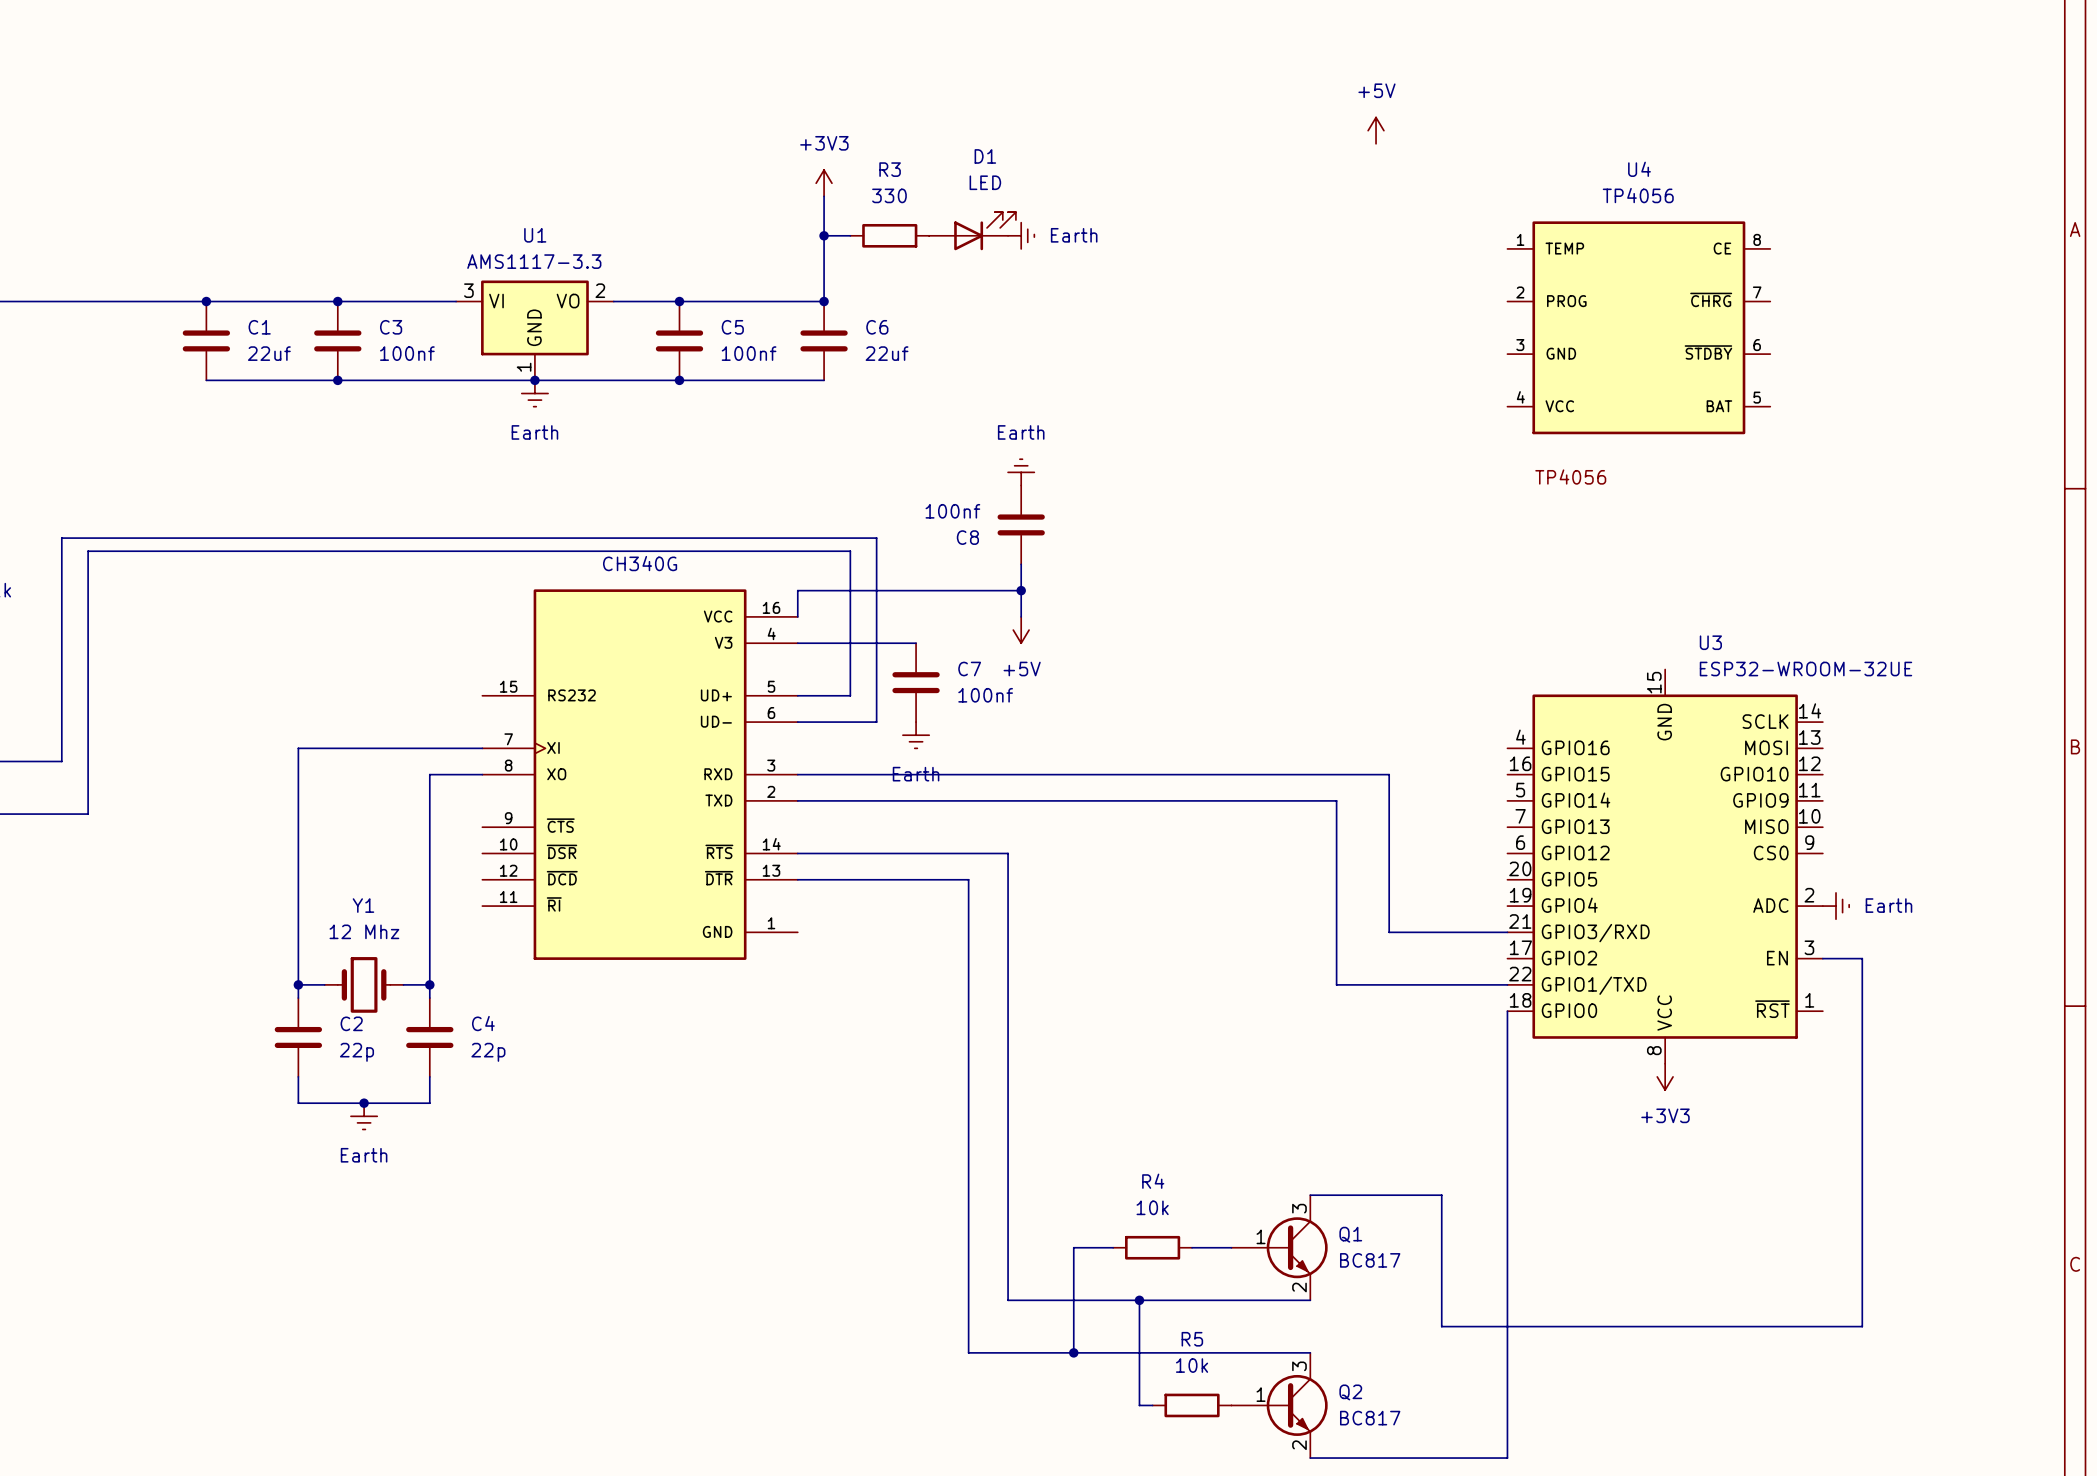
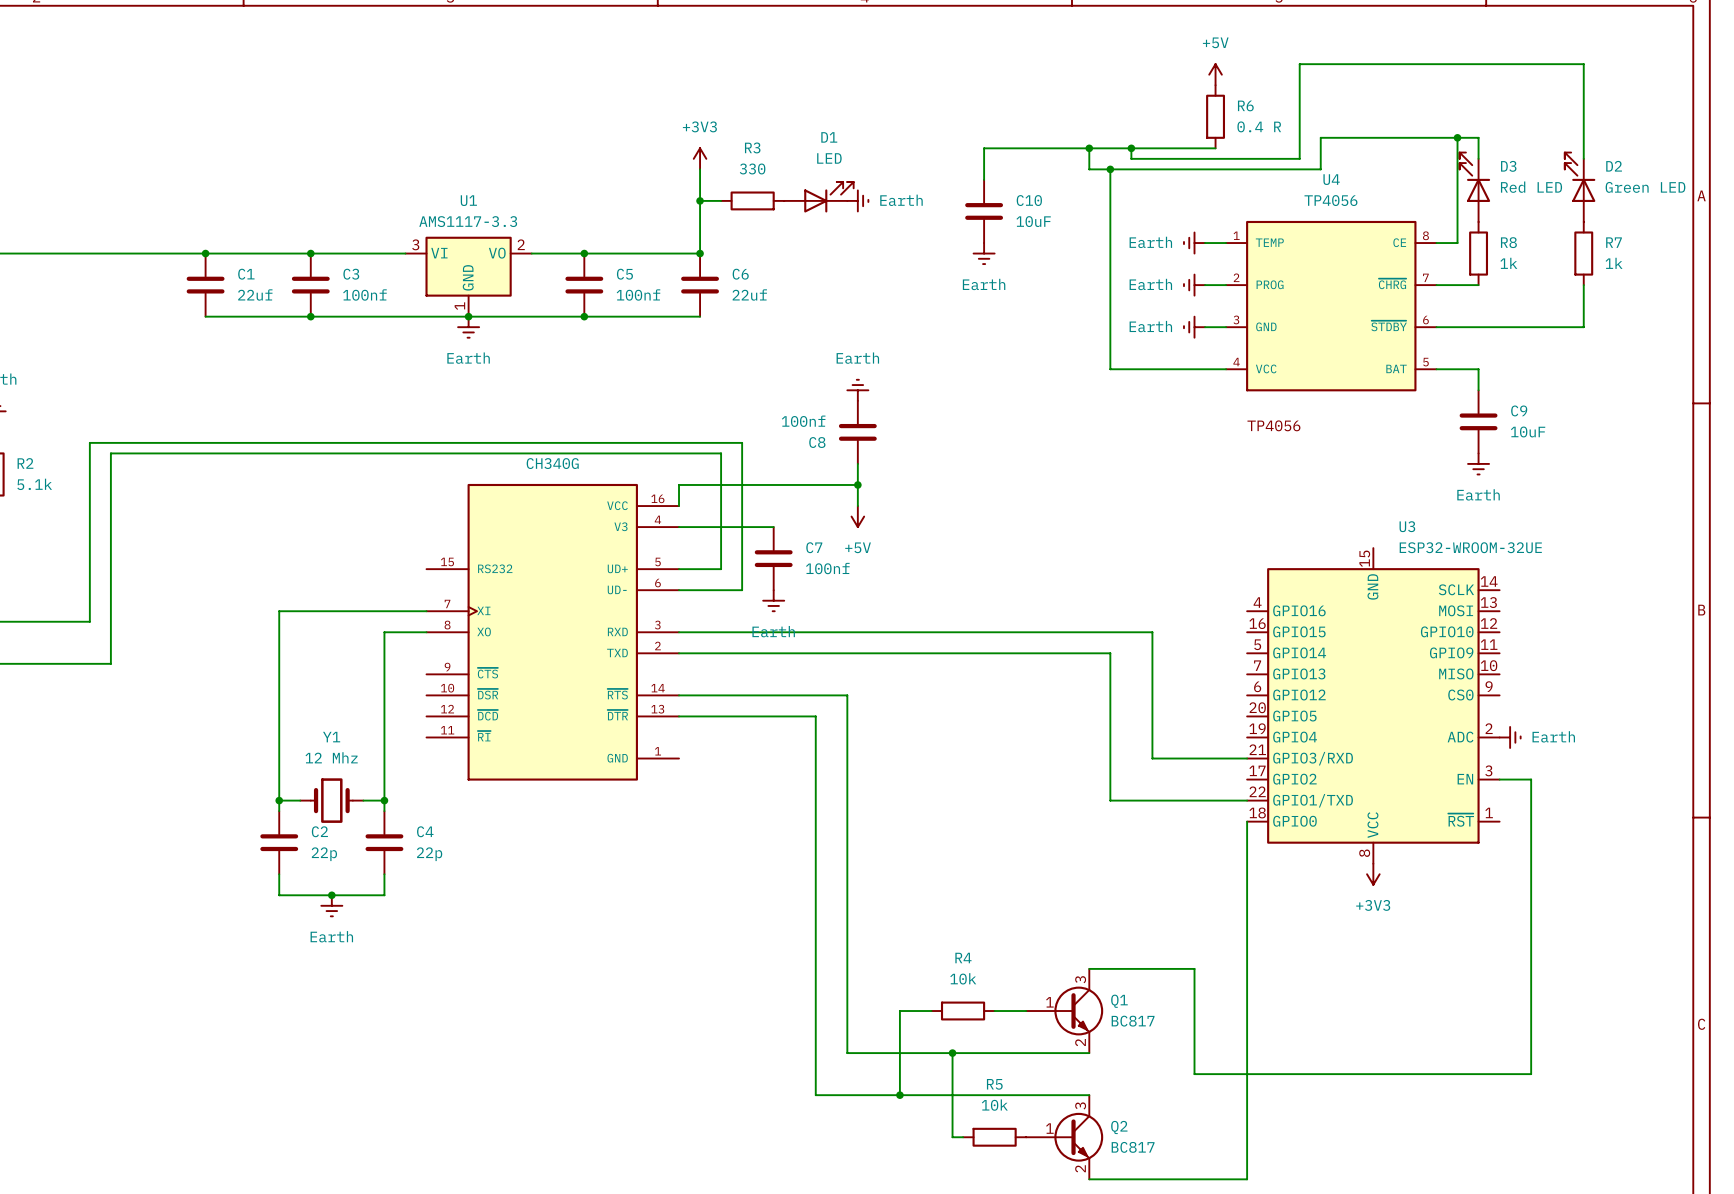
power symbol position: +5V (1376, 130) -> +5V (1215, 74)
R6: none -> 0.4 R (1215, 116)
wire: none -> (1457, 137) (1457, 243) (1436, 243)
junction: none -> (1457, 137)
wire: none -> (1089, 148) (1089, 169) (1320, 169) (1320, 137) (1478, 137) (1478, 158)
junction: none -> (1089, 148)
wire: none -> (1131, 148) (1131, 158) (1299, 158) (1299, 64) (1583, 64) (1583, 158)
junction: none -> (1131, 148)
wire: none -> (1215, 148) (984, 148) (984, 179)
wire: none -> (1110, 169) (1110, 369) (1226, 369)
junction: none -> (1110, 169)
D3: none -> Red LED (1474, 187)
D2: none -> Green LED (1580, 187)
C10: none -> 10uF (984, 211)
power symbol: none -> Earth (1194, 243)
wire: none -> (1205, 243) (1226, 243)
power symbol: none -> Earth (984, 253)
R8: none -> 1k (1478, 253)
R7: none -> 1k (1583, 253)
U4 position: (1638, 327) -> (1331, 306)
power symbol: none -> Earth (1194, 285)
wire: none -> (1205, 285) (1226, 285)
wire: none -> (1436, 285) (1478, 285)
wire: none -> (1583, 285) (1583, 327) (1436, 327)
power symbol: none -> Earth (1194, 327)
wire: none -> (1205, 327) (1226, 327)
wire: none -> (1436, 369) (1478, 369) (1478, 390)
C9: none -> 10uF (1478, 421)
power symbol: none -> Earth (1478, 463)

